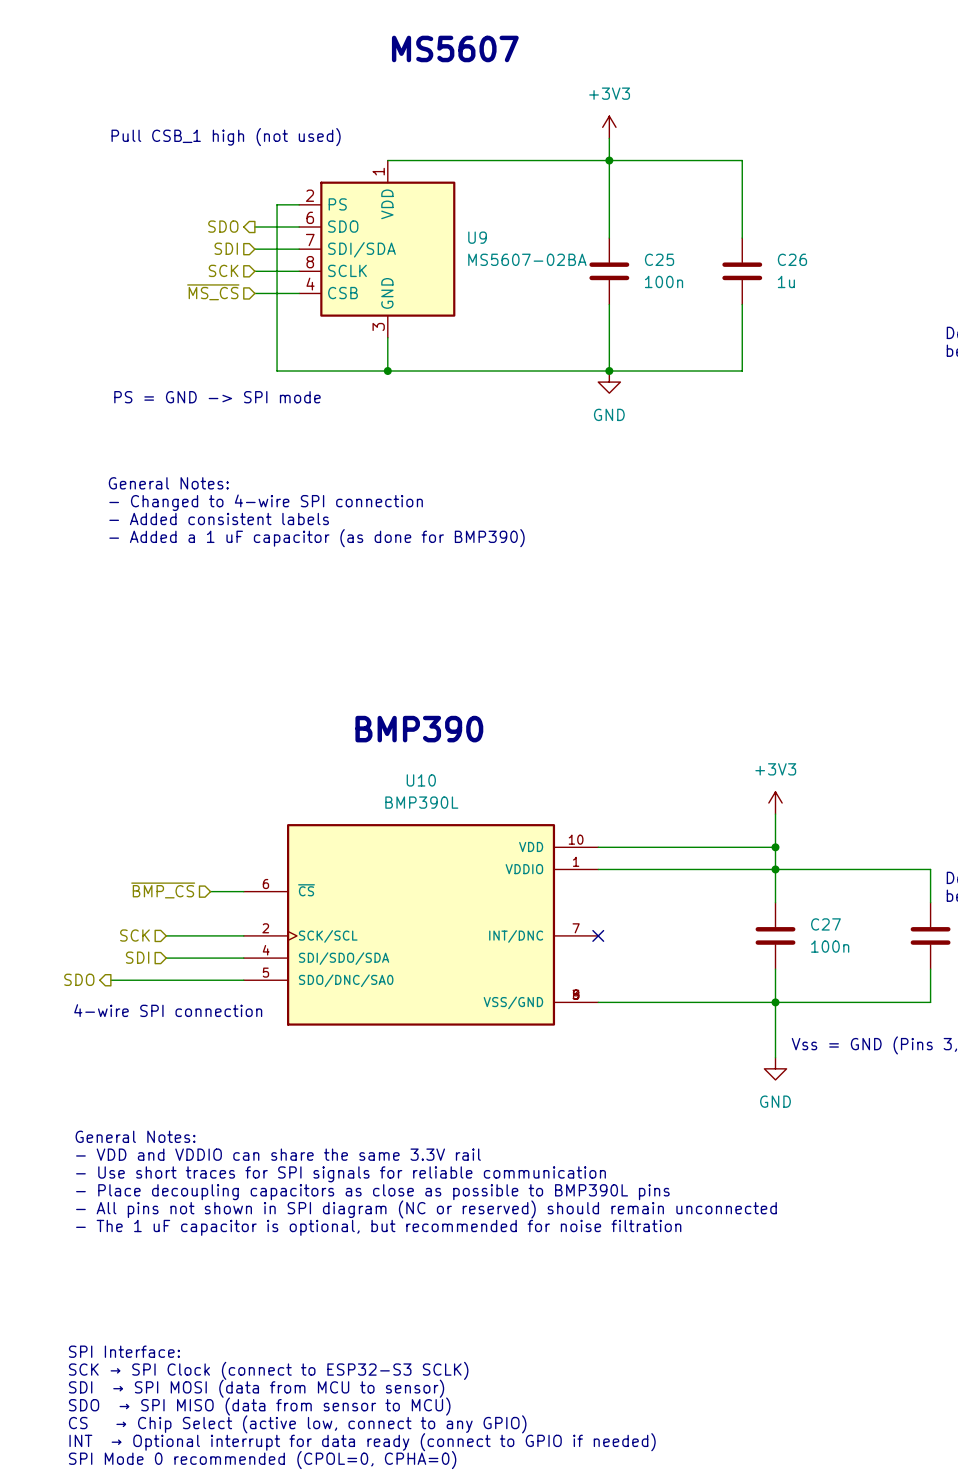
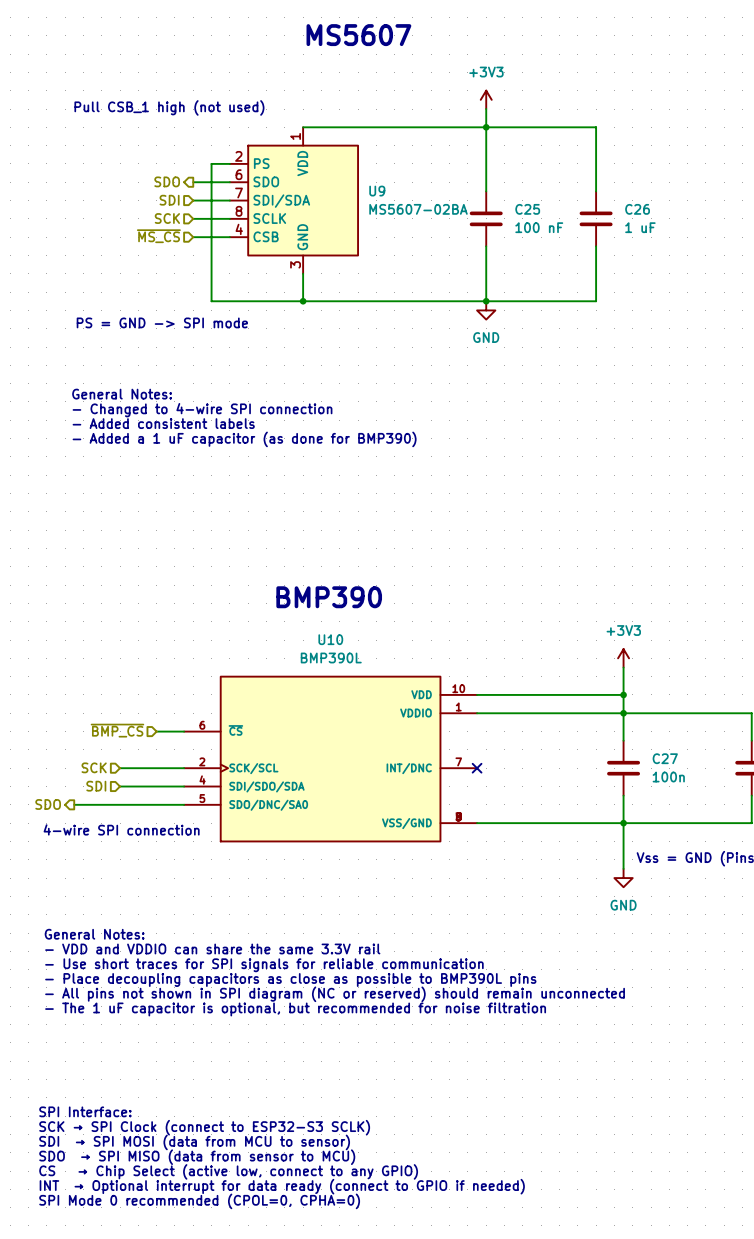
C25 value: 100n (664, 281) -> 100 nF (539, 227)
C26 value: 1u (786, 281) -> 1 uF (640, 227)

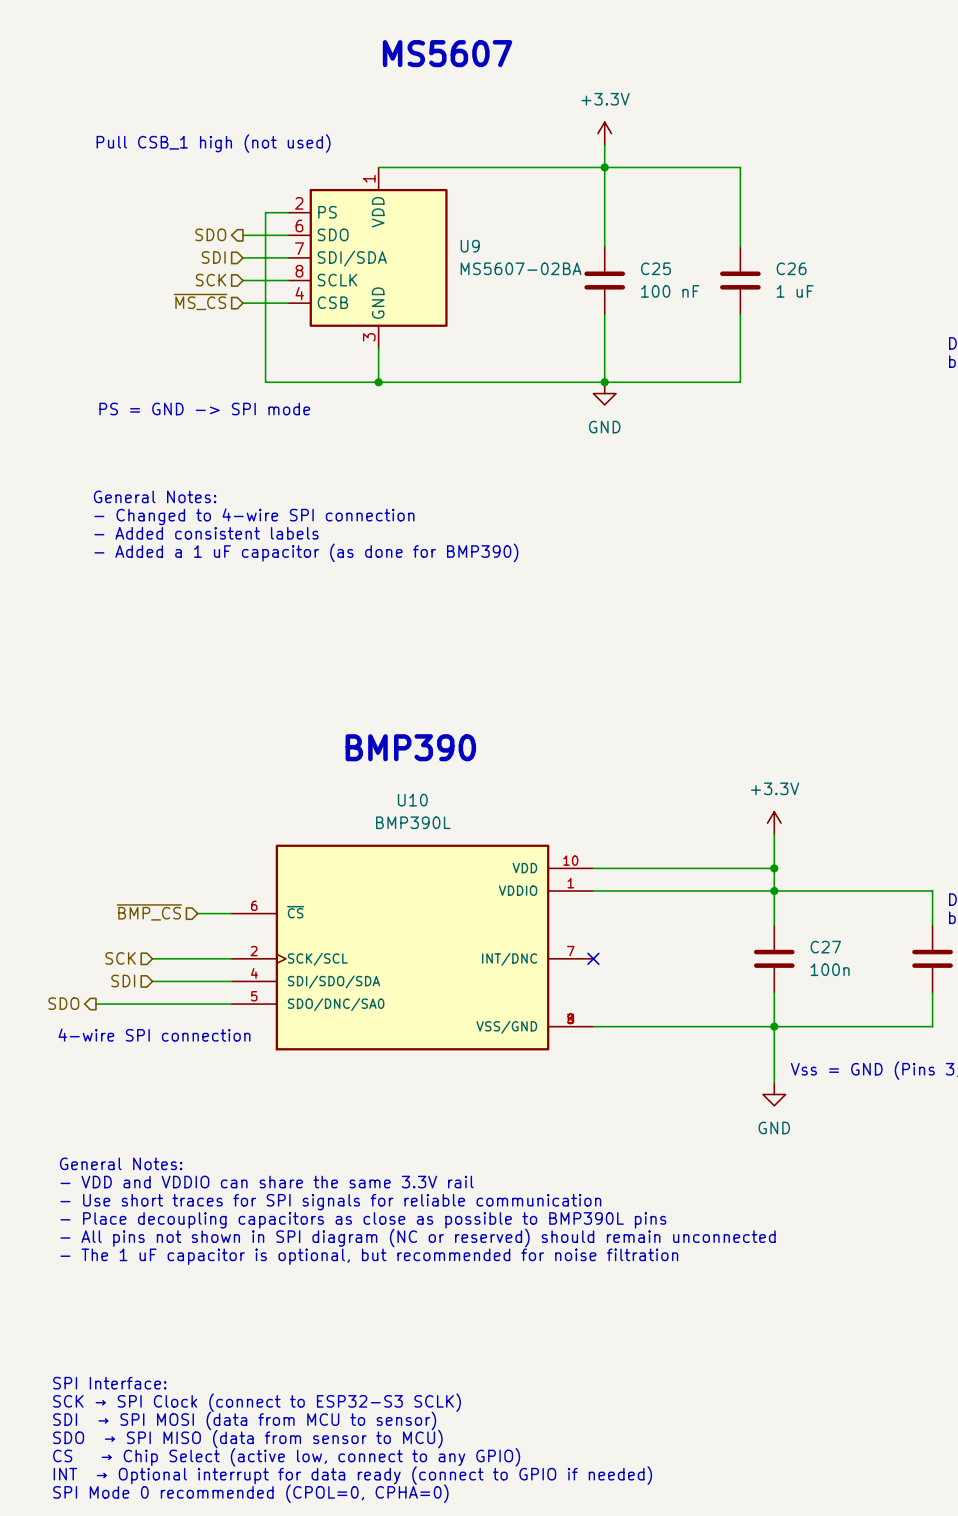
power symbol: +3V3 (486, 99) -> +3.3V (604, 133)
power symbol: +3V3 (623, 658) -> +3.3V (774, 823)

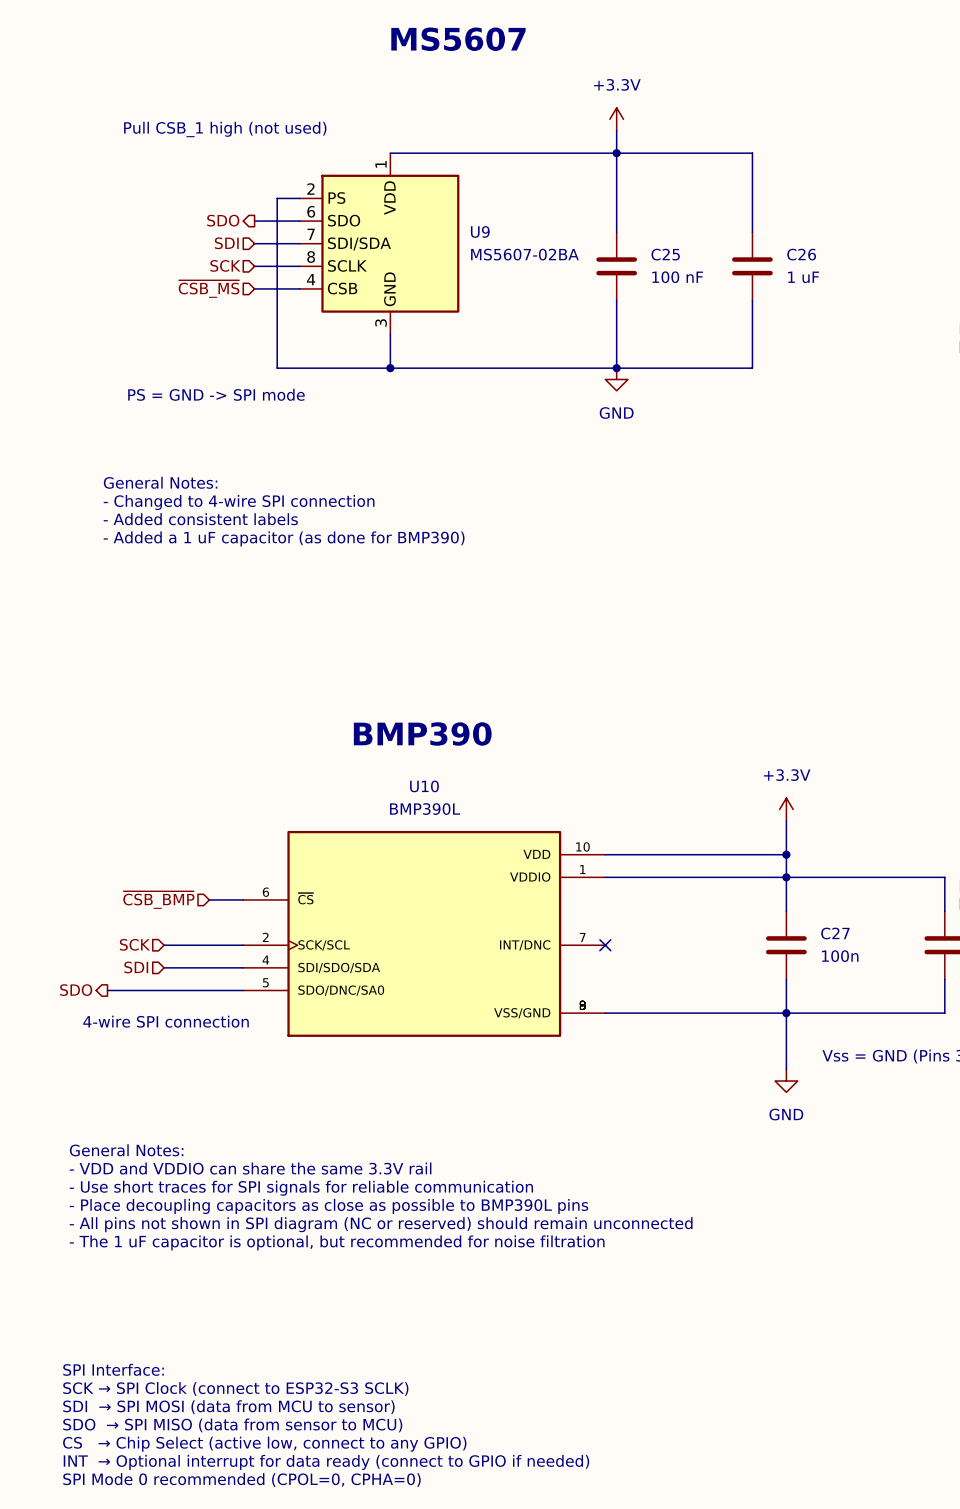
hierarchical label: ~{MS_CS} (200, 301) -> ~{CSB_MS} (209, 289)
hierarchical label: ~{BMP_CS} (149, 912) -> ~{CSB_BMP} (158, 900)

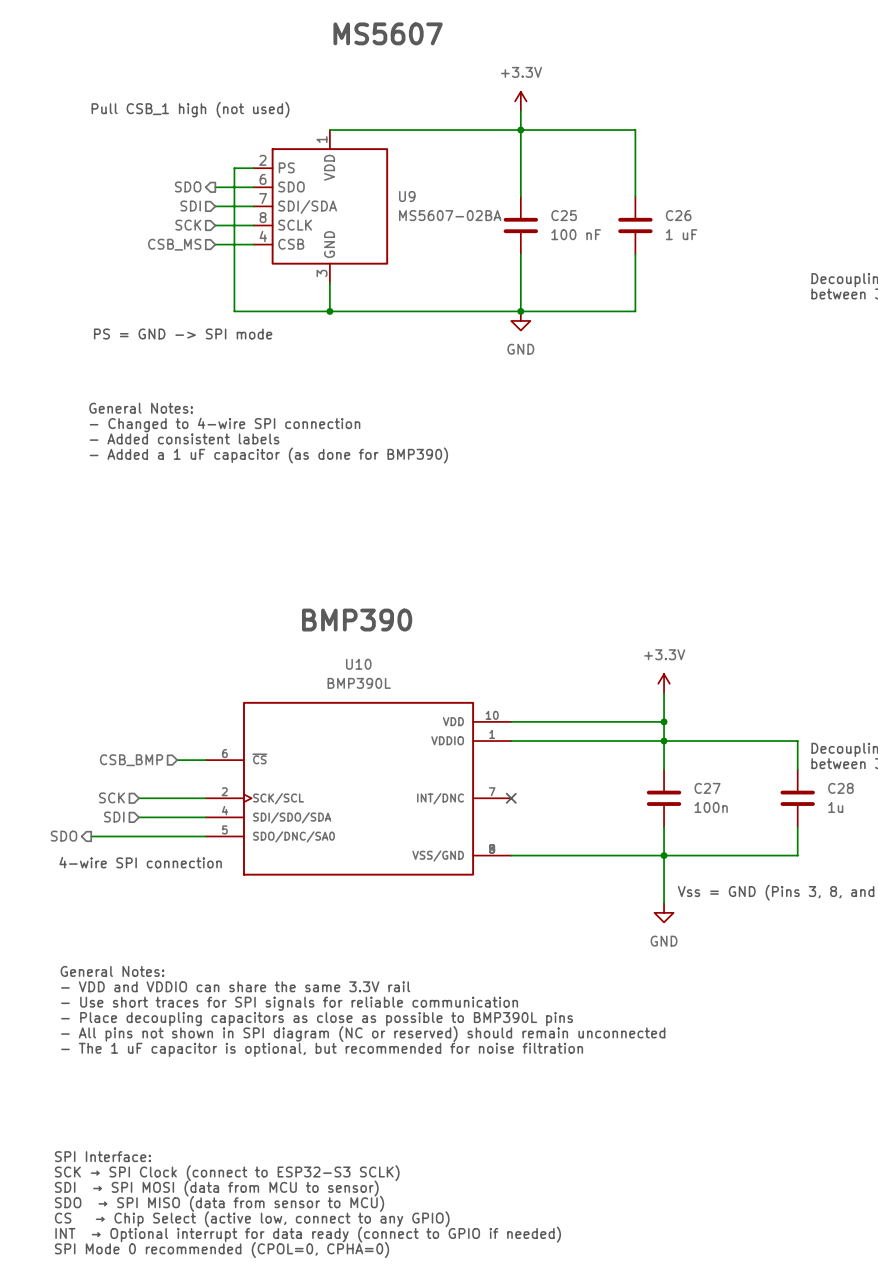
hierarchical label: ~{CSB_MS} (209, 289) -> CSB_MS (174, 244)
hierarchical label: ~{CSB_BMP} (158, 900) -> CSB_BMP (131, 760)

